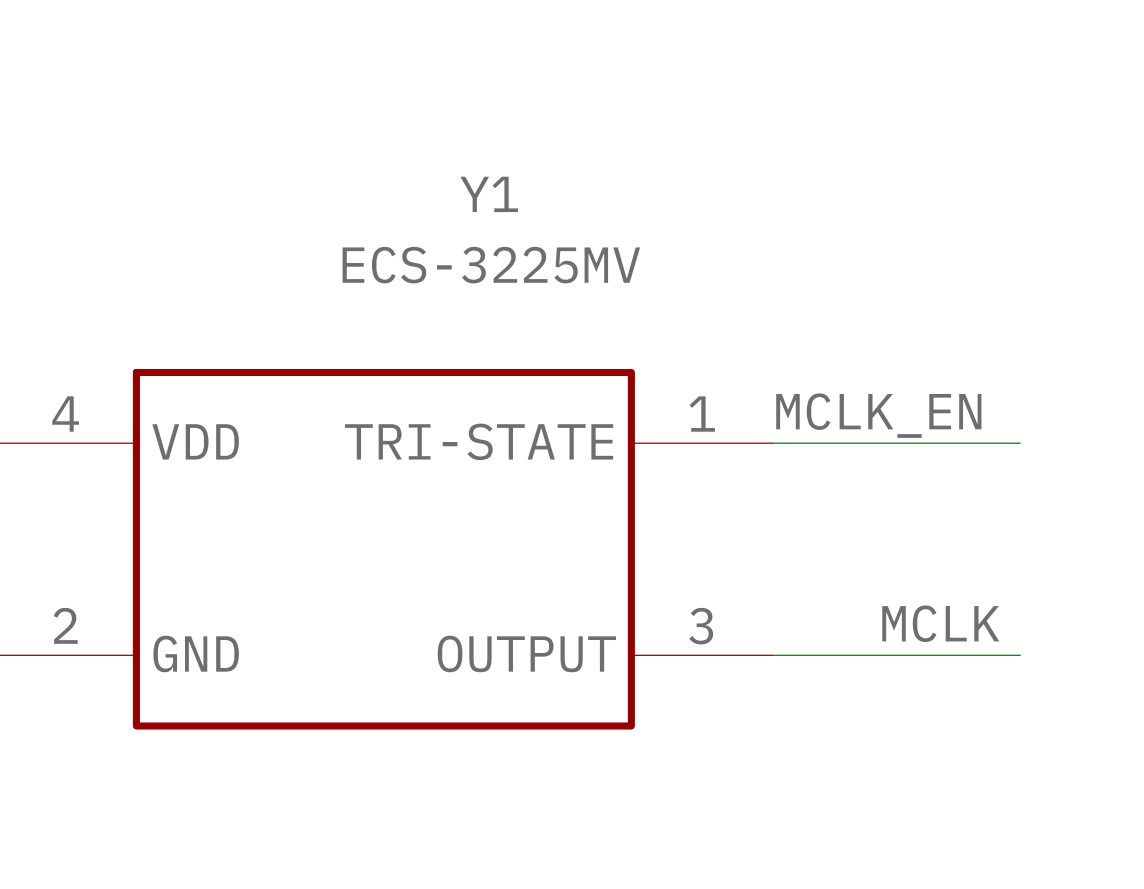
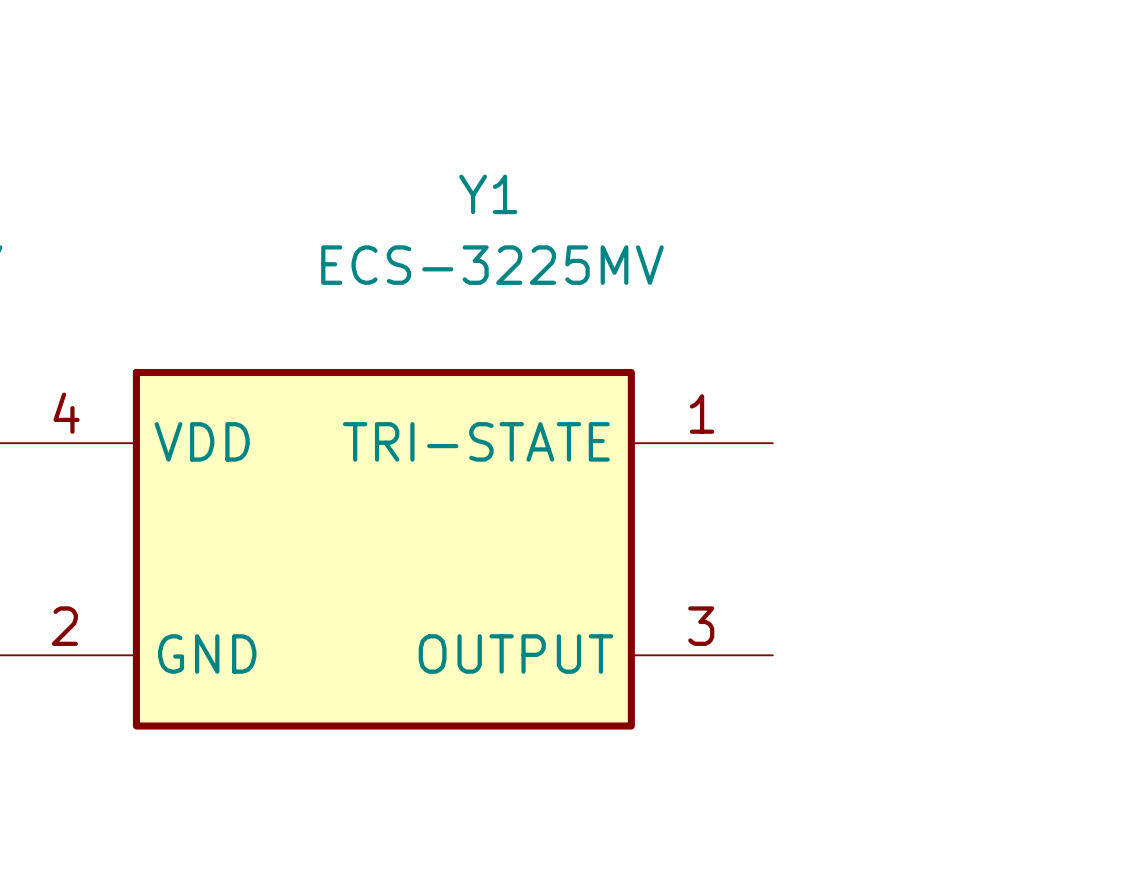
label: MCLK_EN (878, 415) -> none
wire: (772, 443) (1020, 443) -> none
label: MCLK (940, 623) -> none
wire: (772, 655) (1020, 655) -> none

